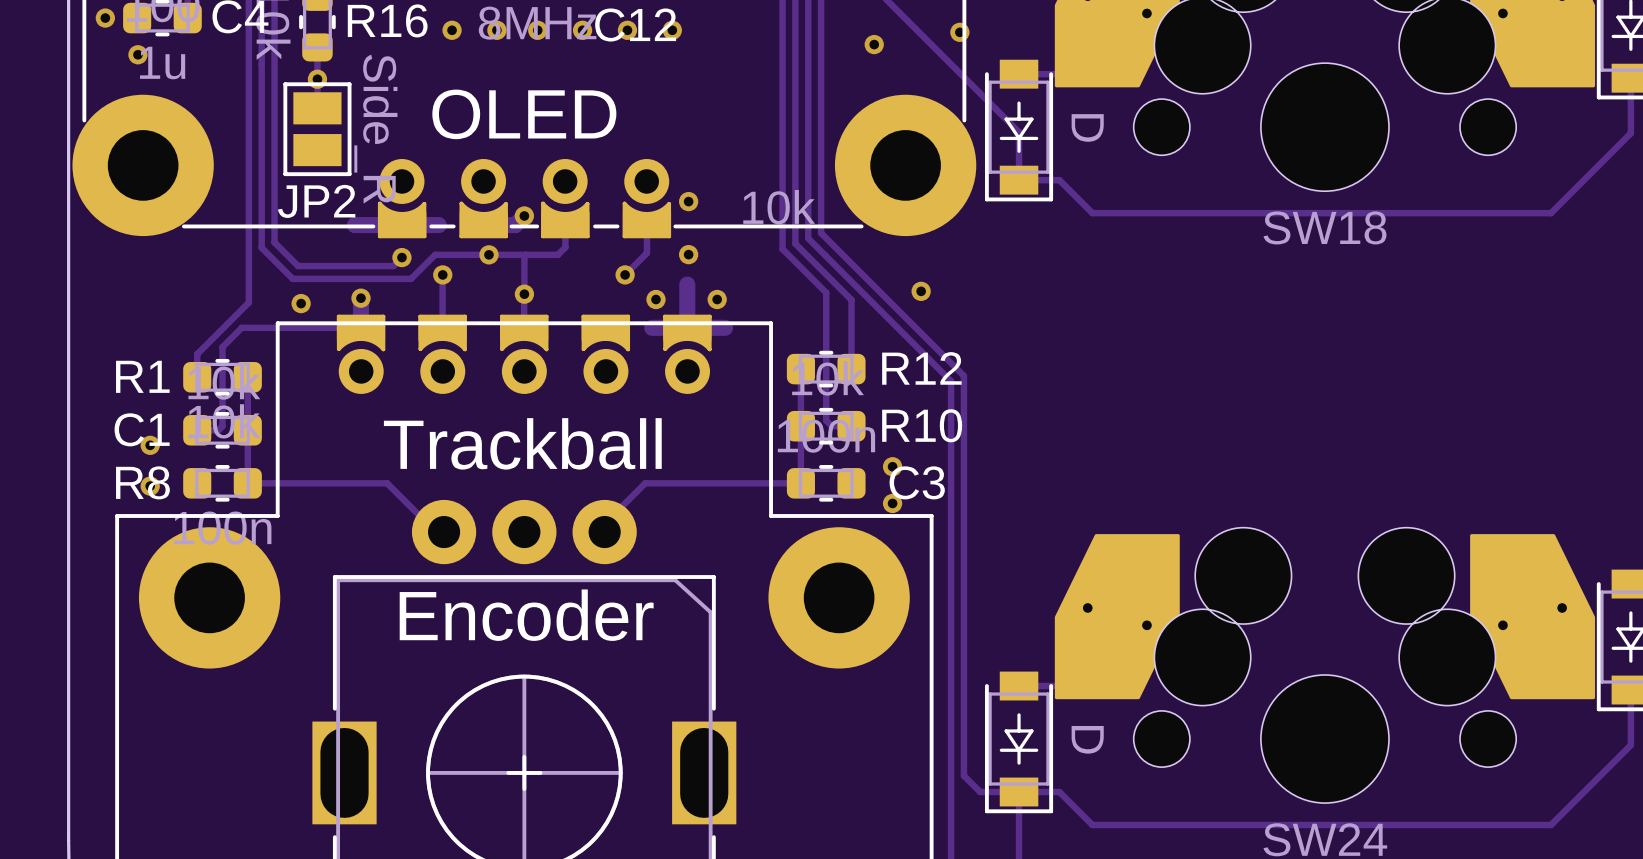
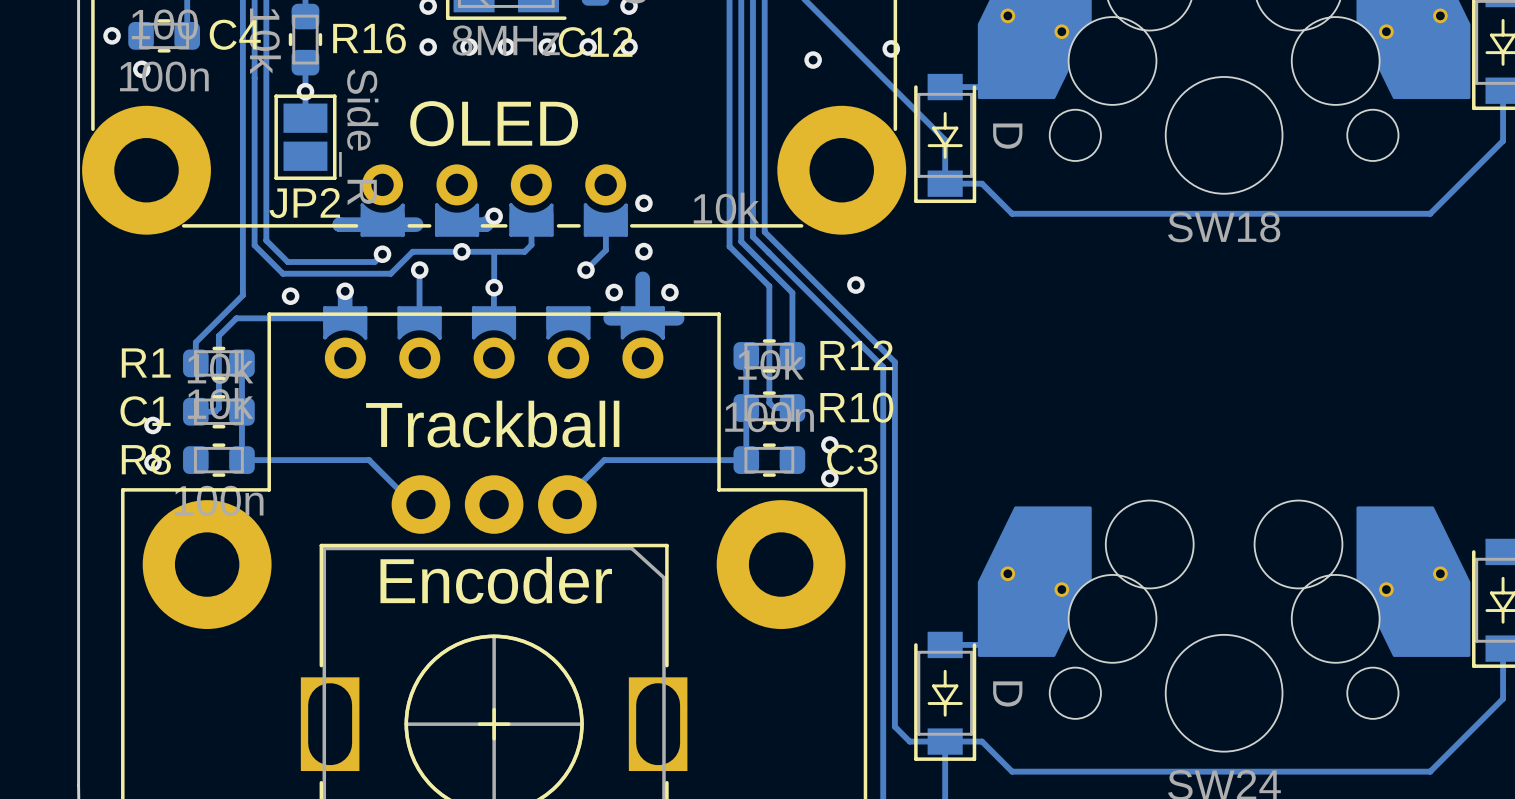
C4 value: 1u (162, 63) -> 100n (164, 76)

